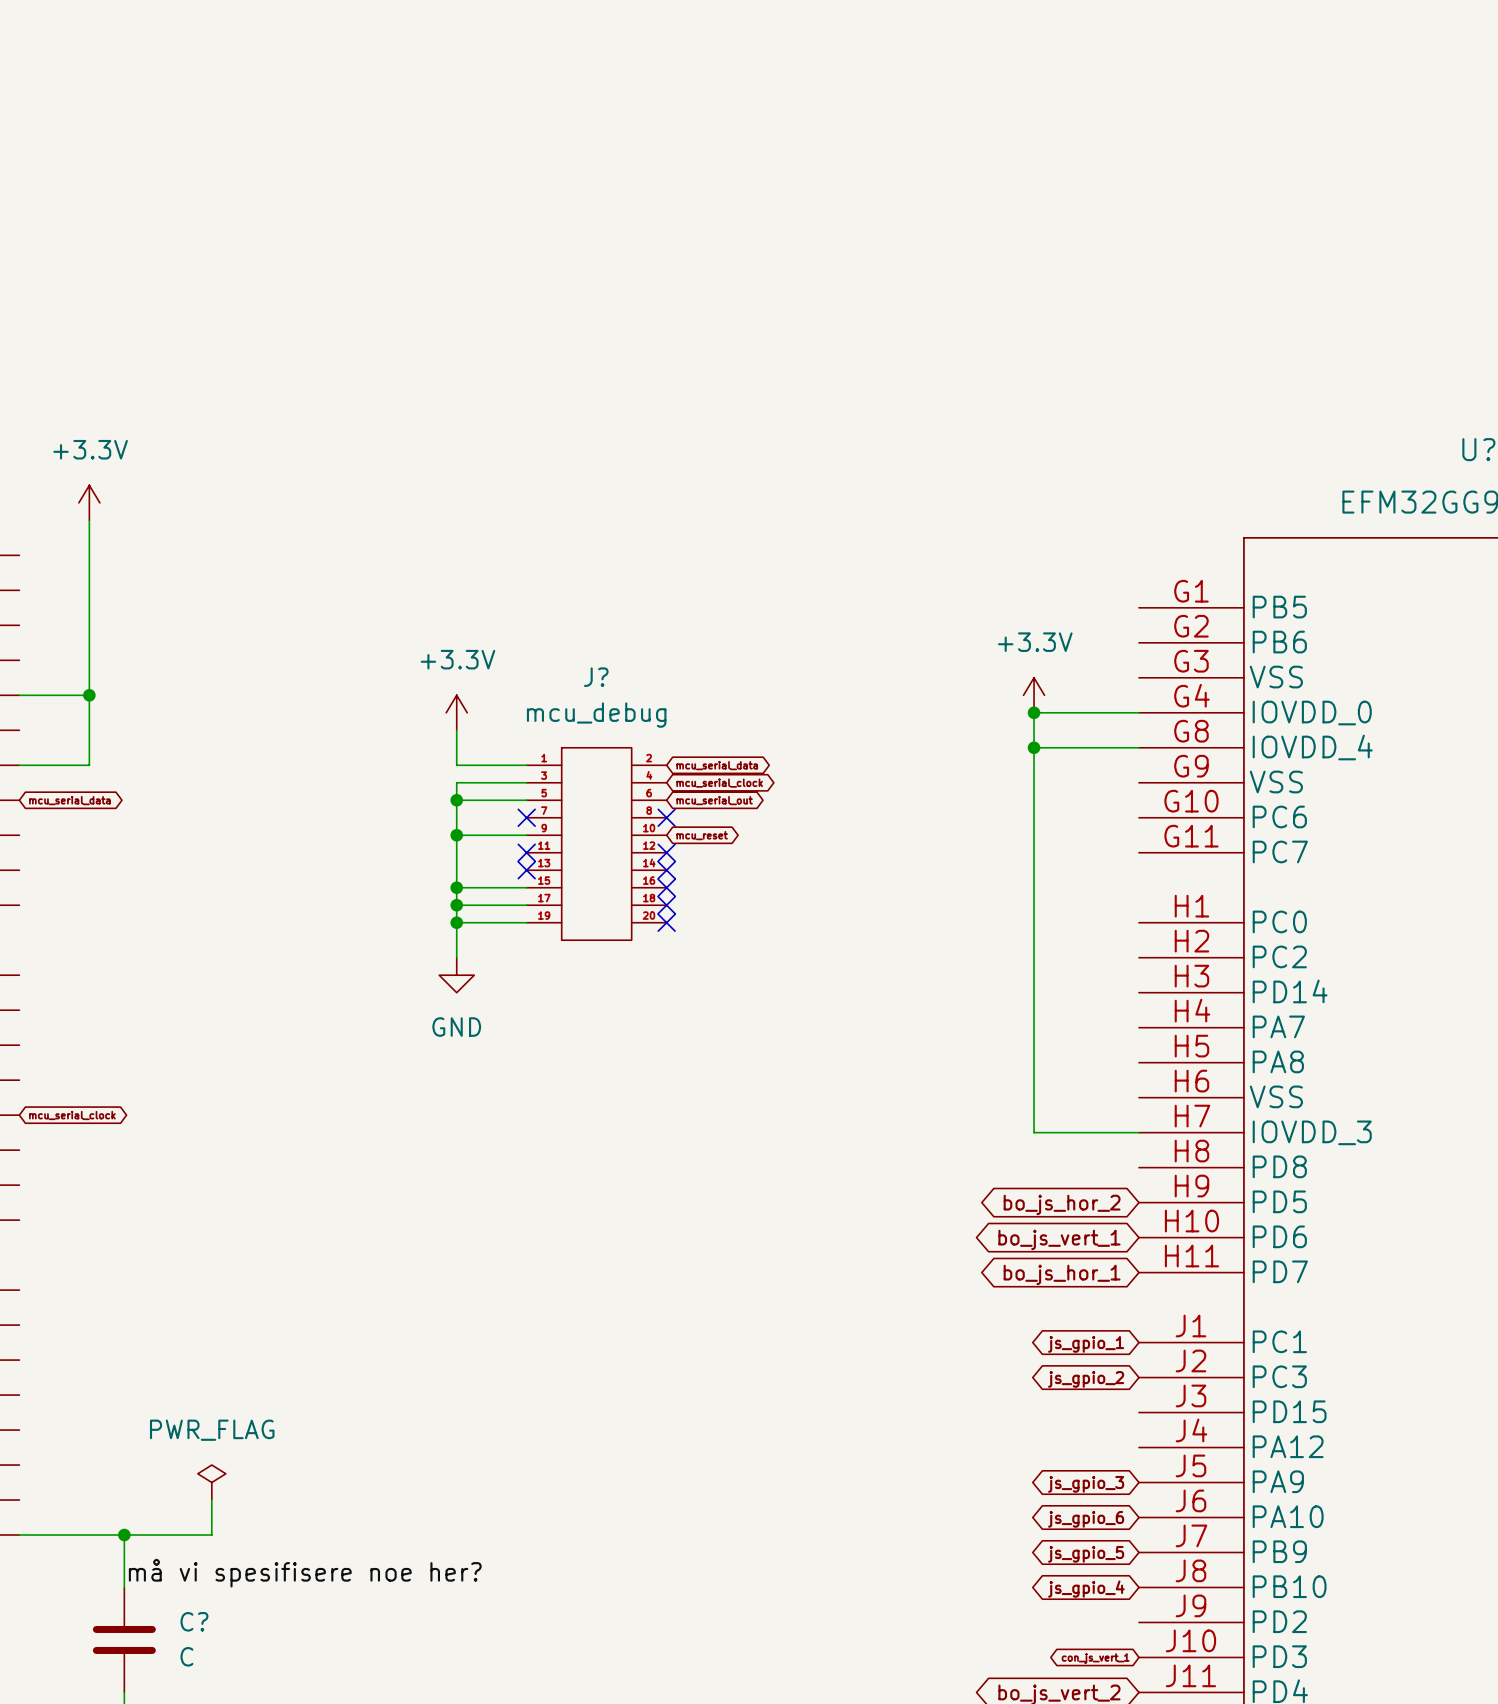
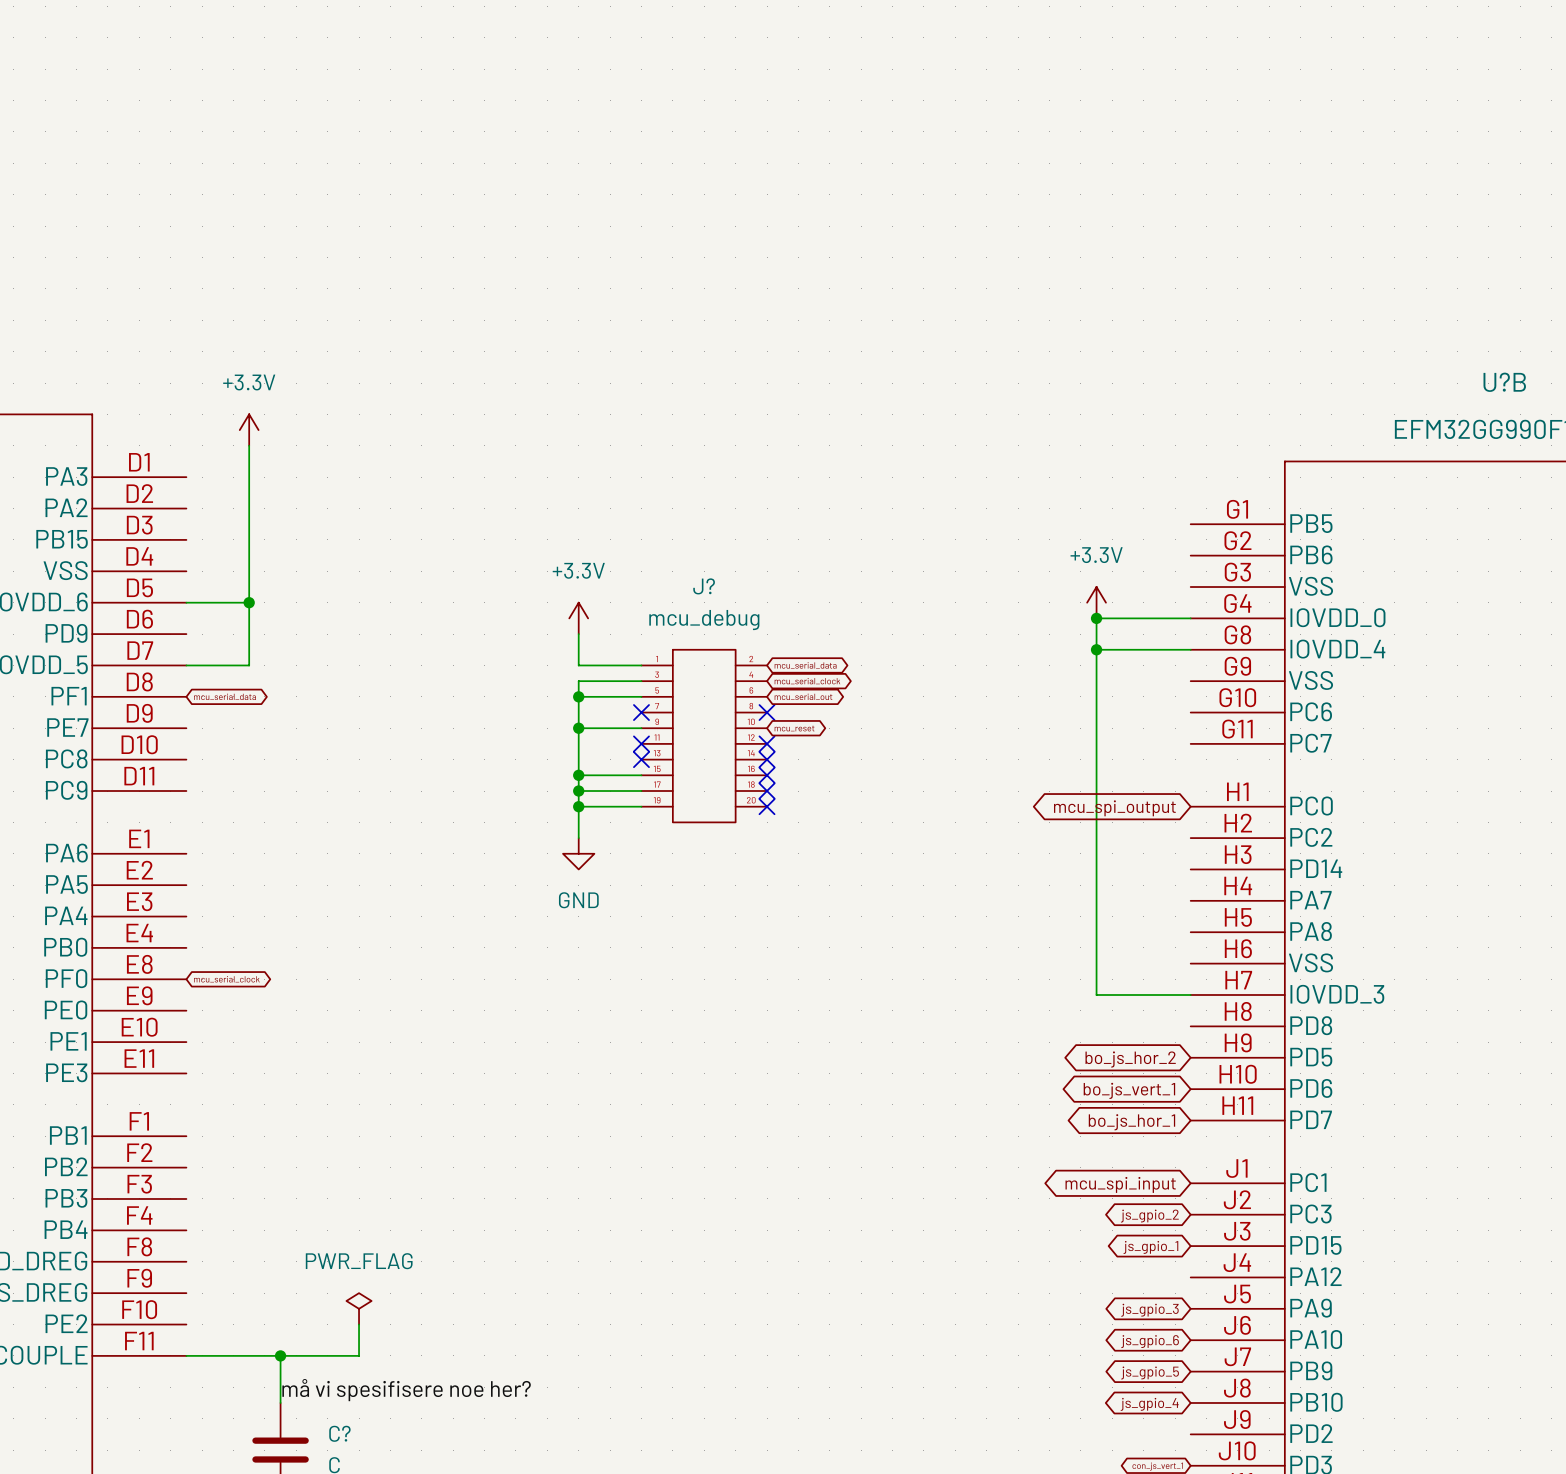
global label: none -> mcu_spi_output (1114, 808)
global label: js_gpio_1 (1086, 1344) -> mcu_spi_input (1120, 1184)
global label: none -> js_gpio_1 (1150, 1247)

